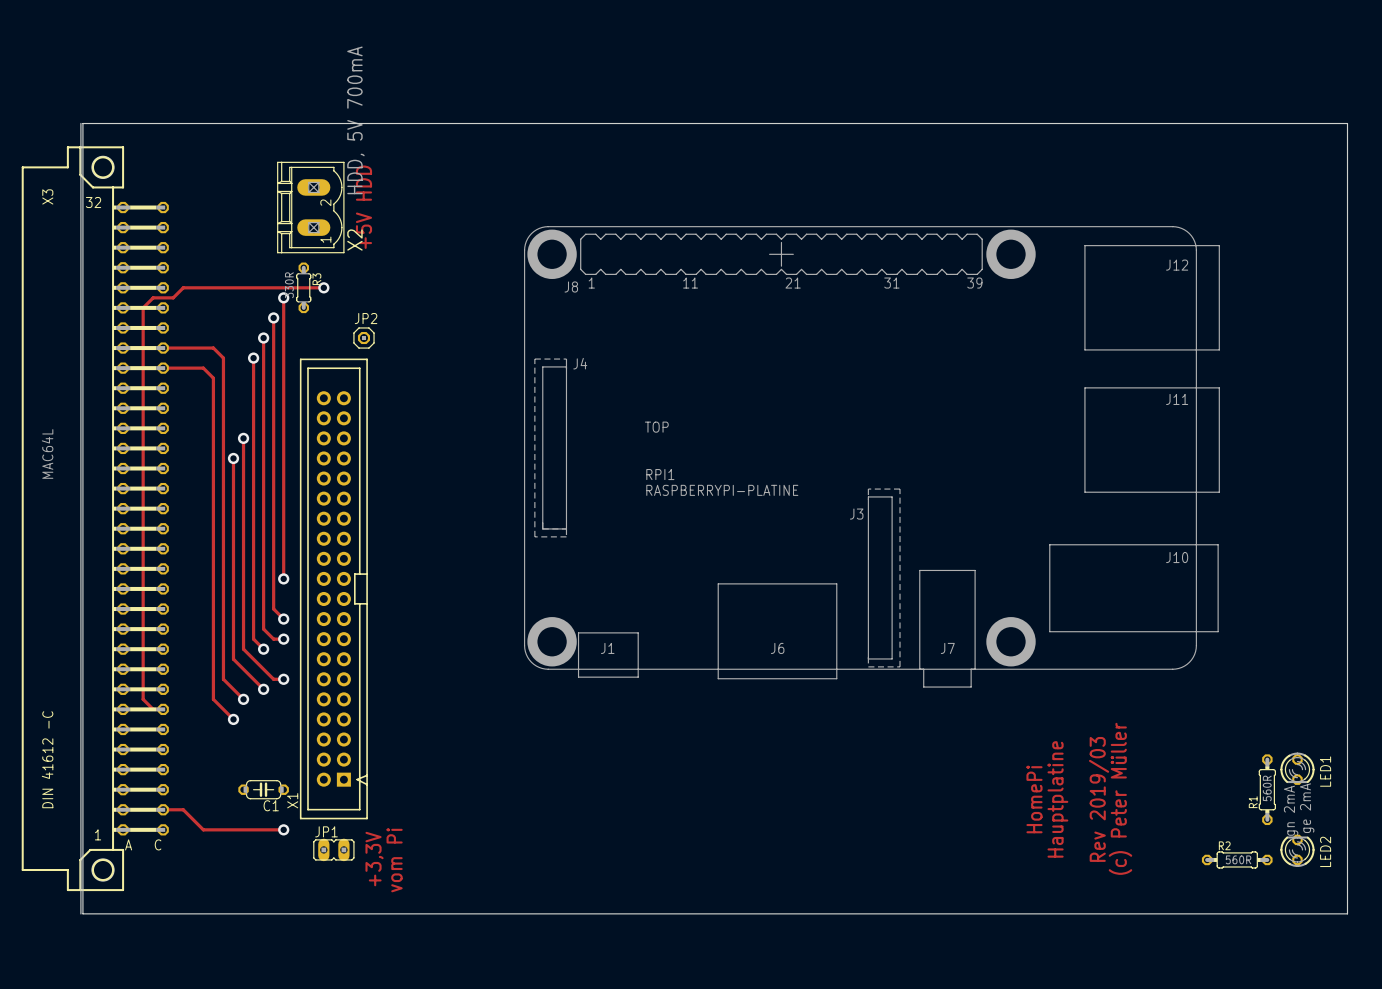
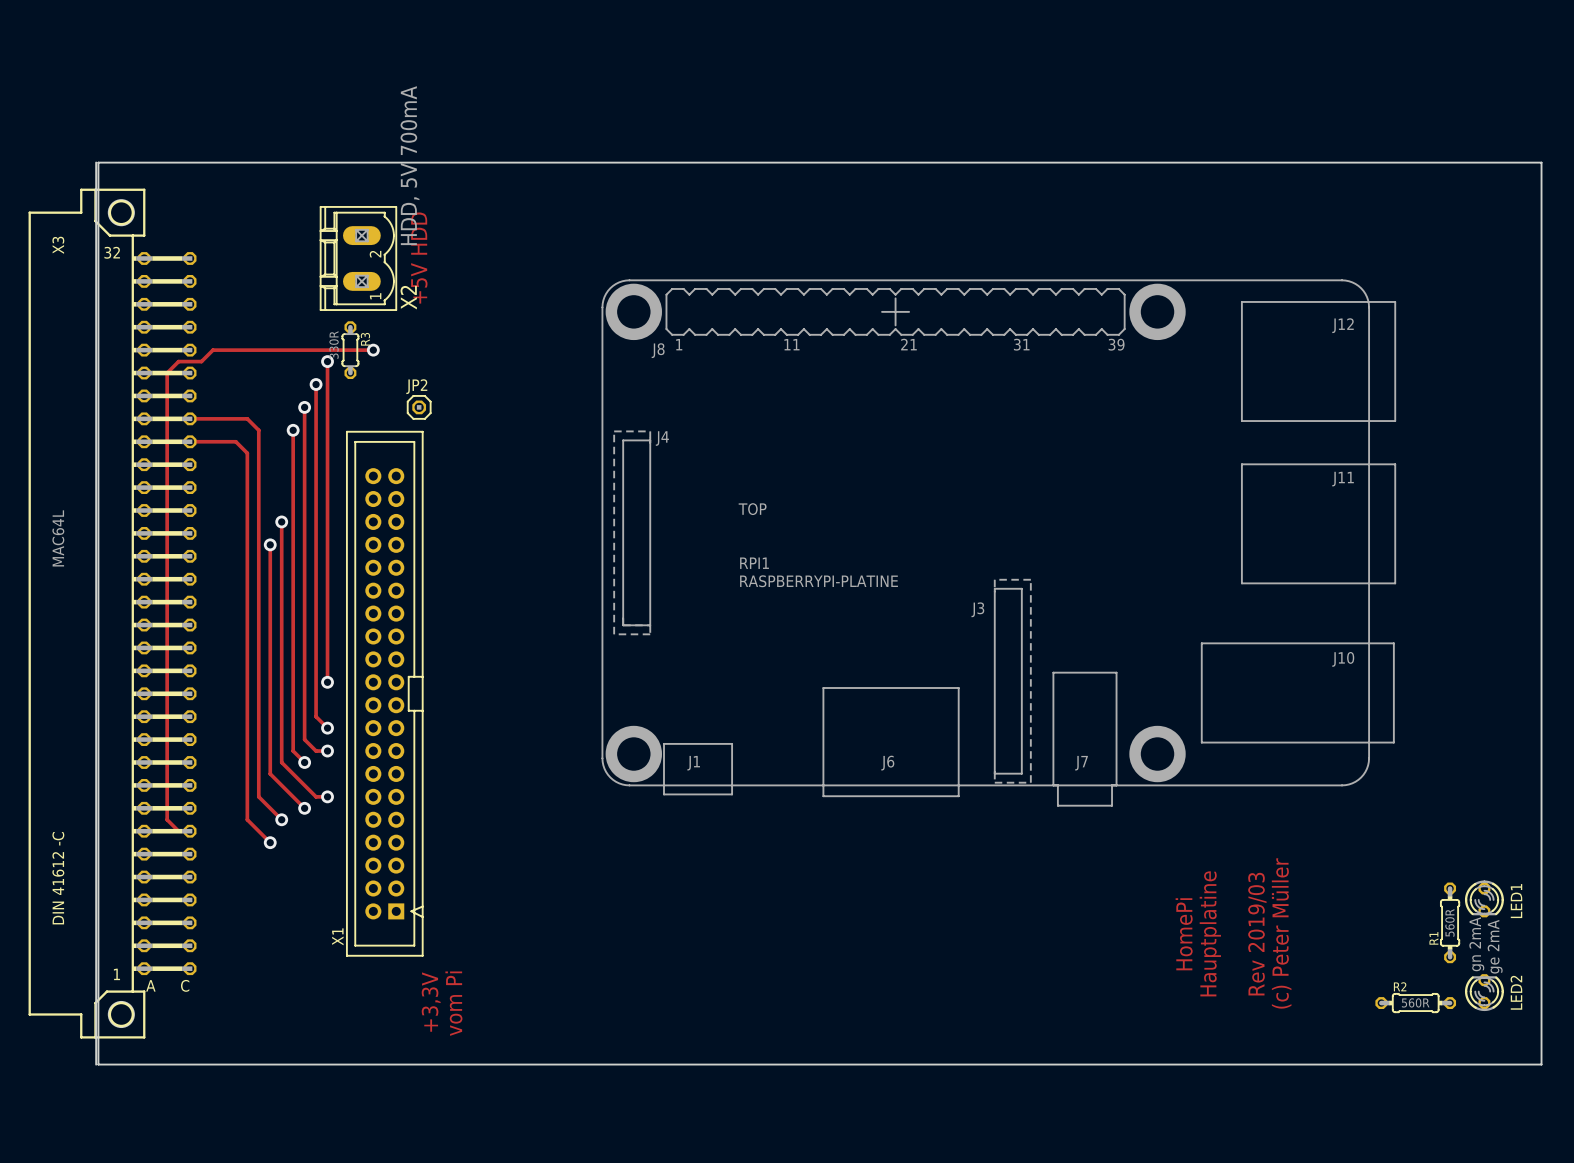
C1: (263, 789) -> none
track: (163, 809) (183, 809) (203, 829) (283, 829) -> none
via: (283, 829) -> none
JP1: (333, 849) -> none

